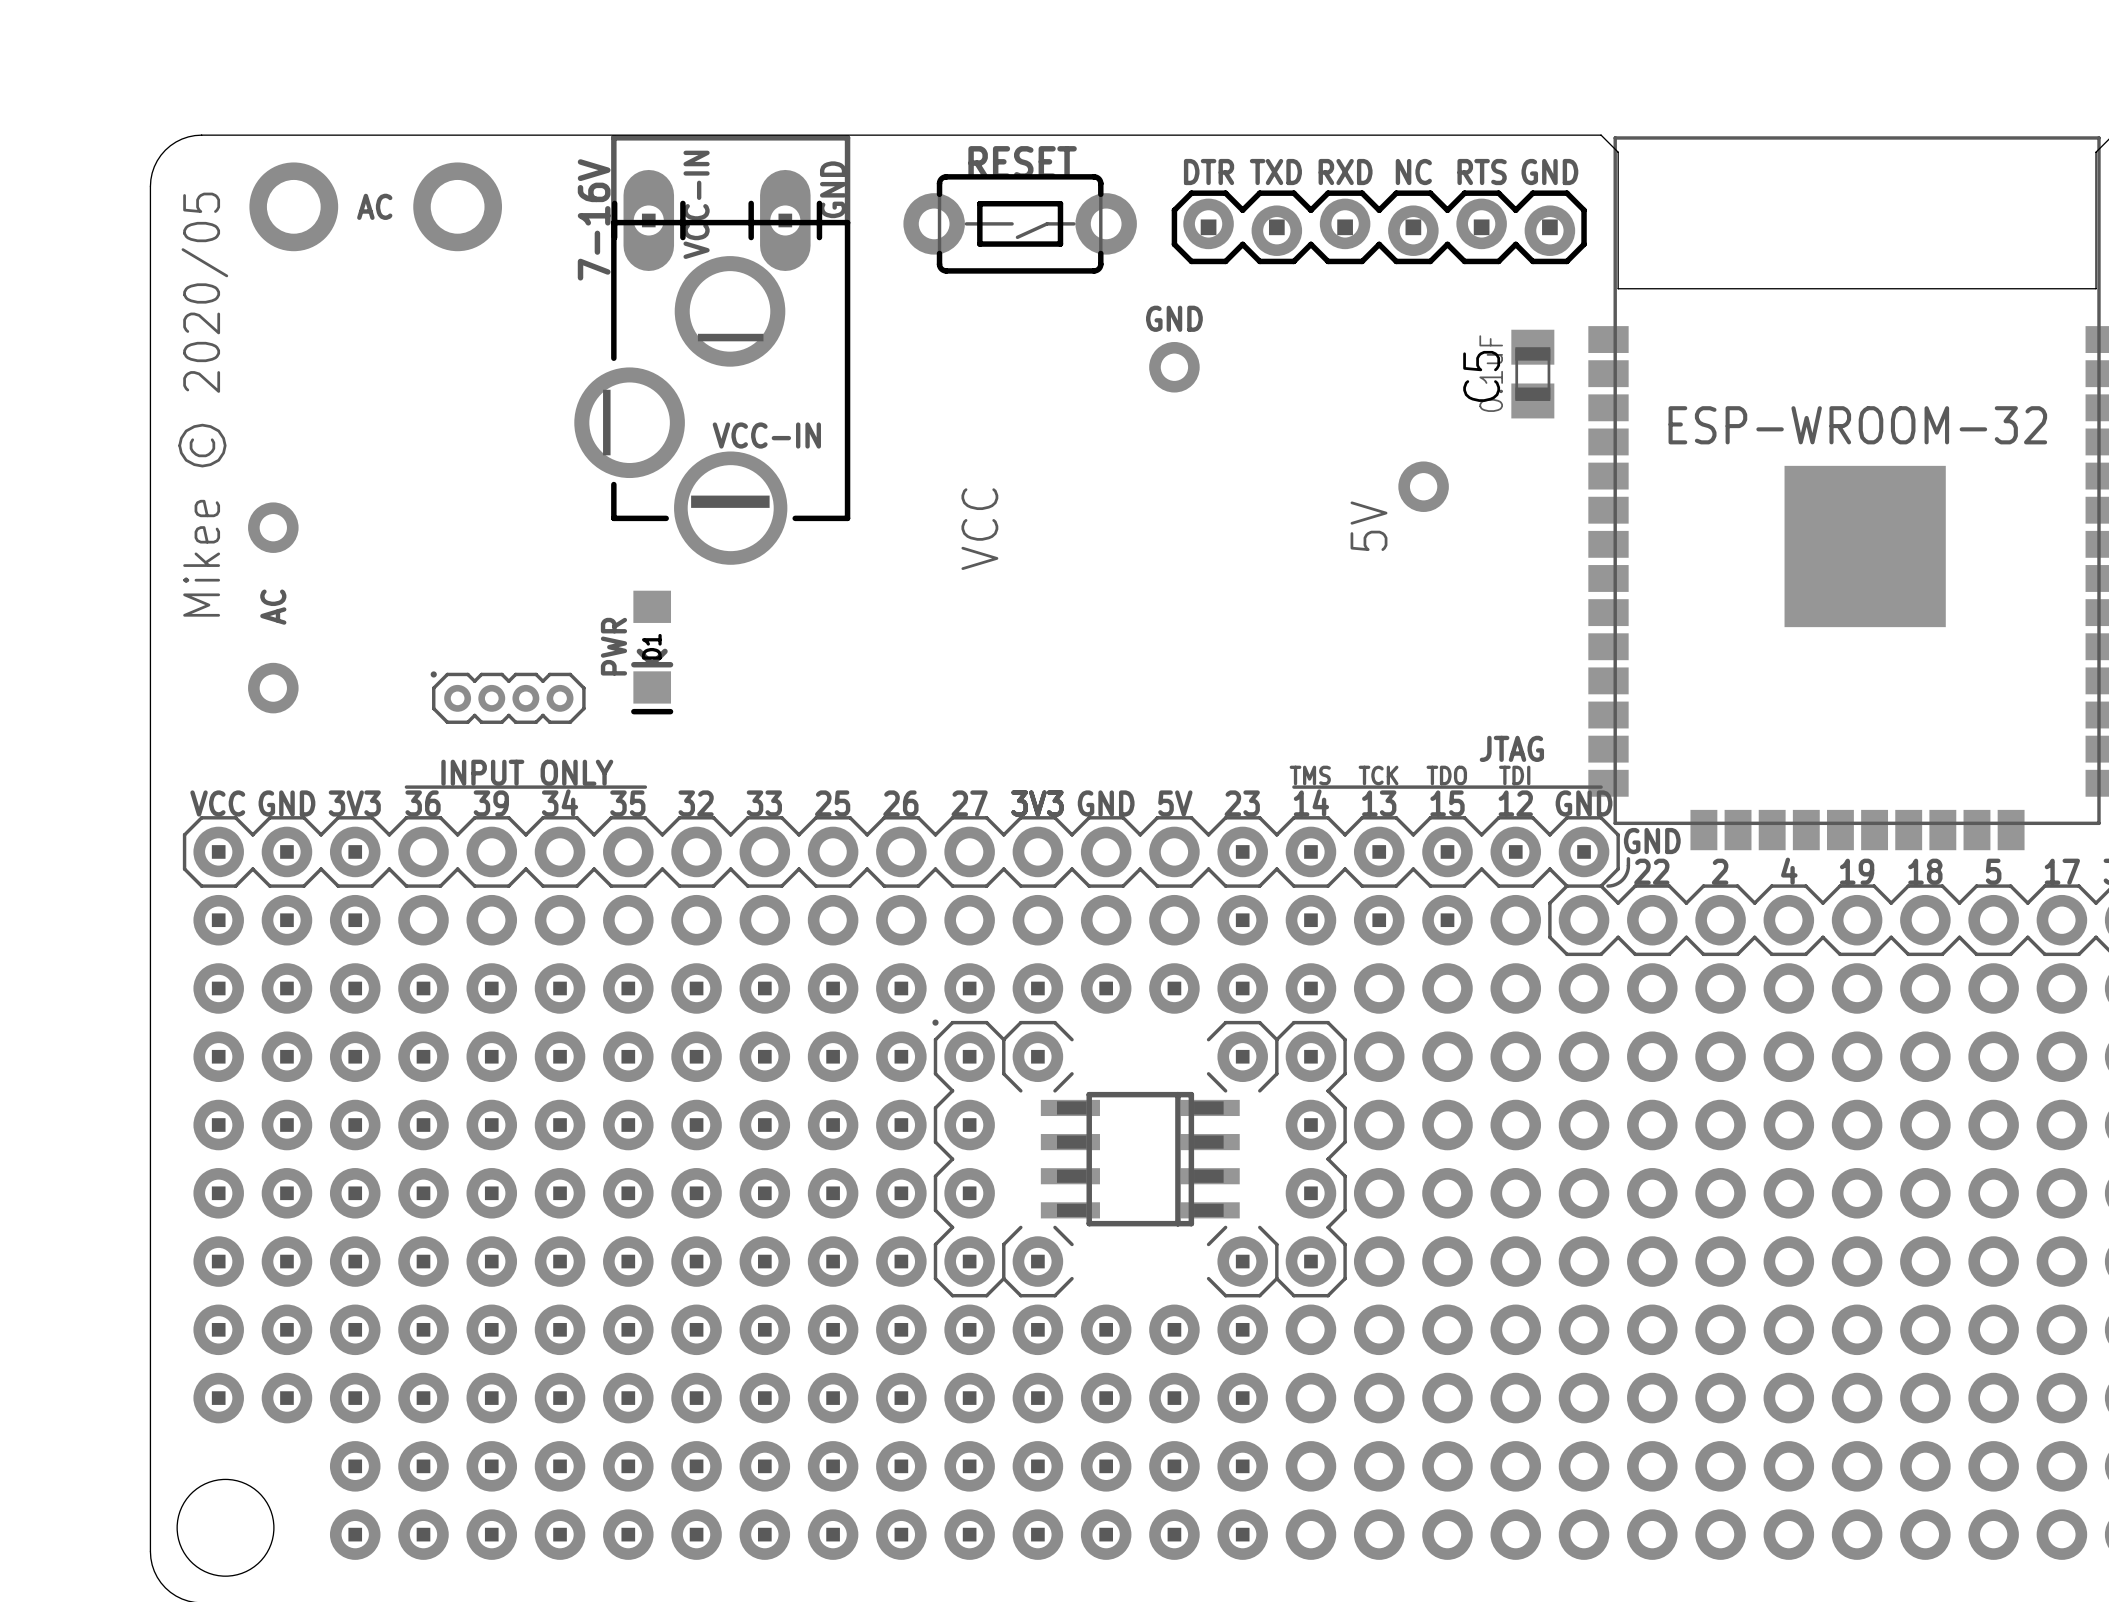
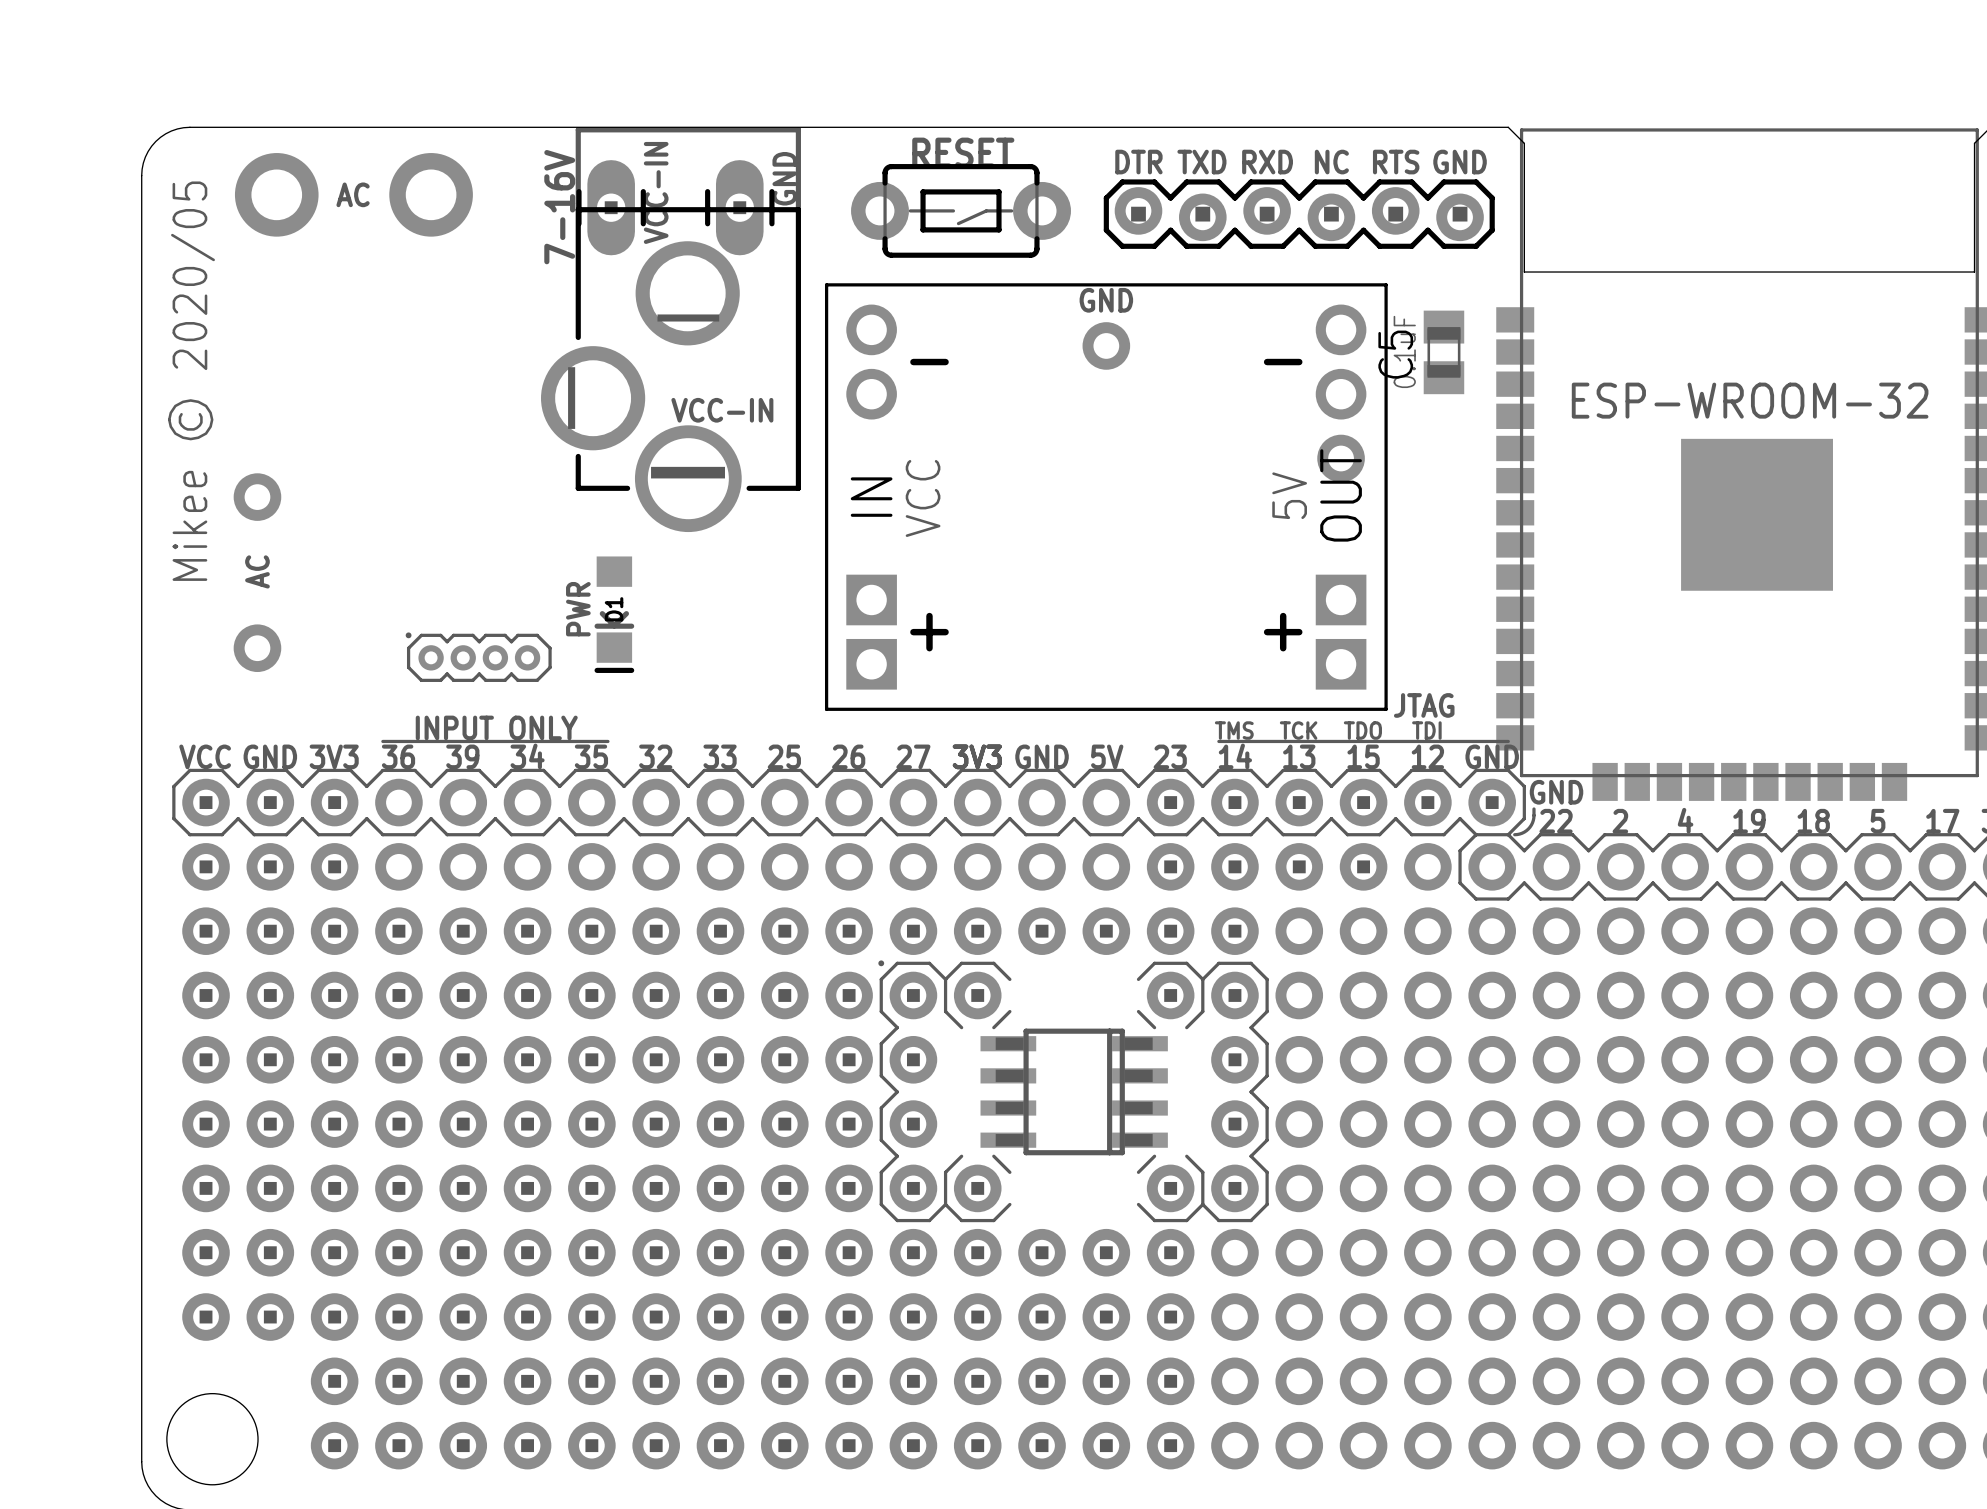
part: none -> (1106, 497)

